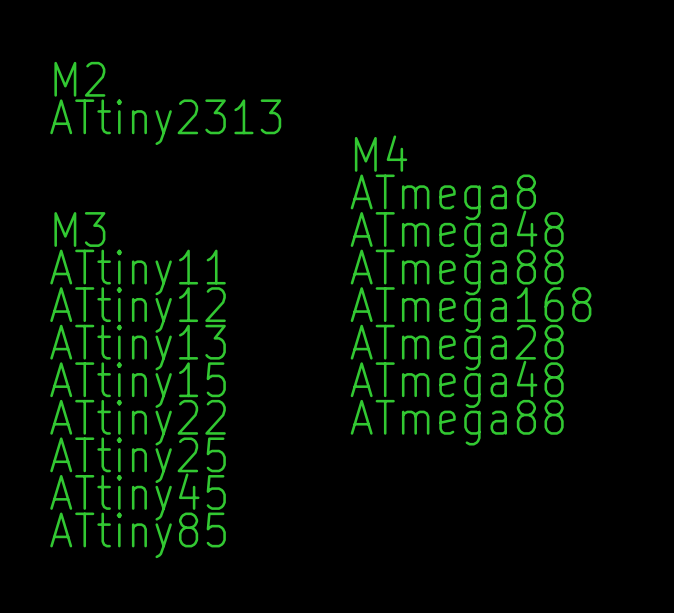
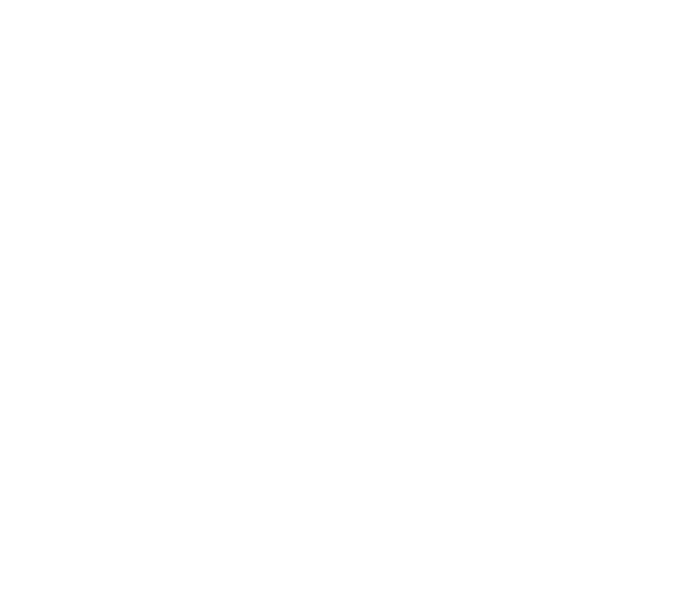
text: M2 (79, 79) -> none
text: ATtiny2313 (165, 122) -> none
text: M4 (381, 153) -> none
text: ATmega8 (443, 197) -> none
text: M3 (79, 229) -> none
text: ATmega48 (457, 234) -> none
text: ATtiny11 (138, 272) -> none
text: ATmega88 (457, 272) -> none
text: ATtiny12 (138, 310) -> none
text: ATmega168 (471, 310) -> none
text: ATtiny13 (138, 347) -> none
text: ATmega28 (457, 347) -> none
text: ATmega48 (457, 384) -> none
text: ATtiny15 (138, 385) -> none
text: ATtiny22 (138, 422) -> none
text: ATmega88 (457, 422) -> none
text: ATtiny25 (138, 460) -> none
text: ATtiny45 (138, 497) -> none
text: ATtiny85 (138, 535) -> none

